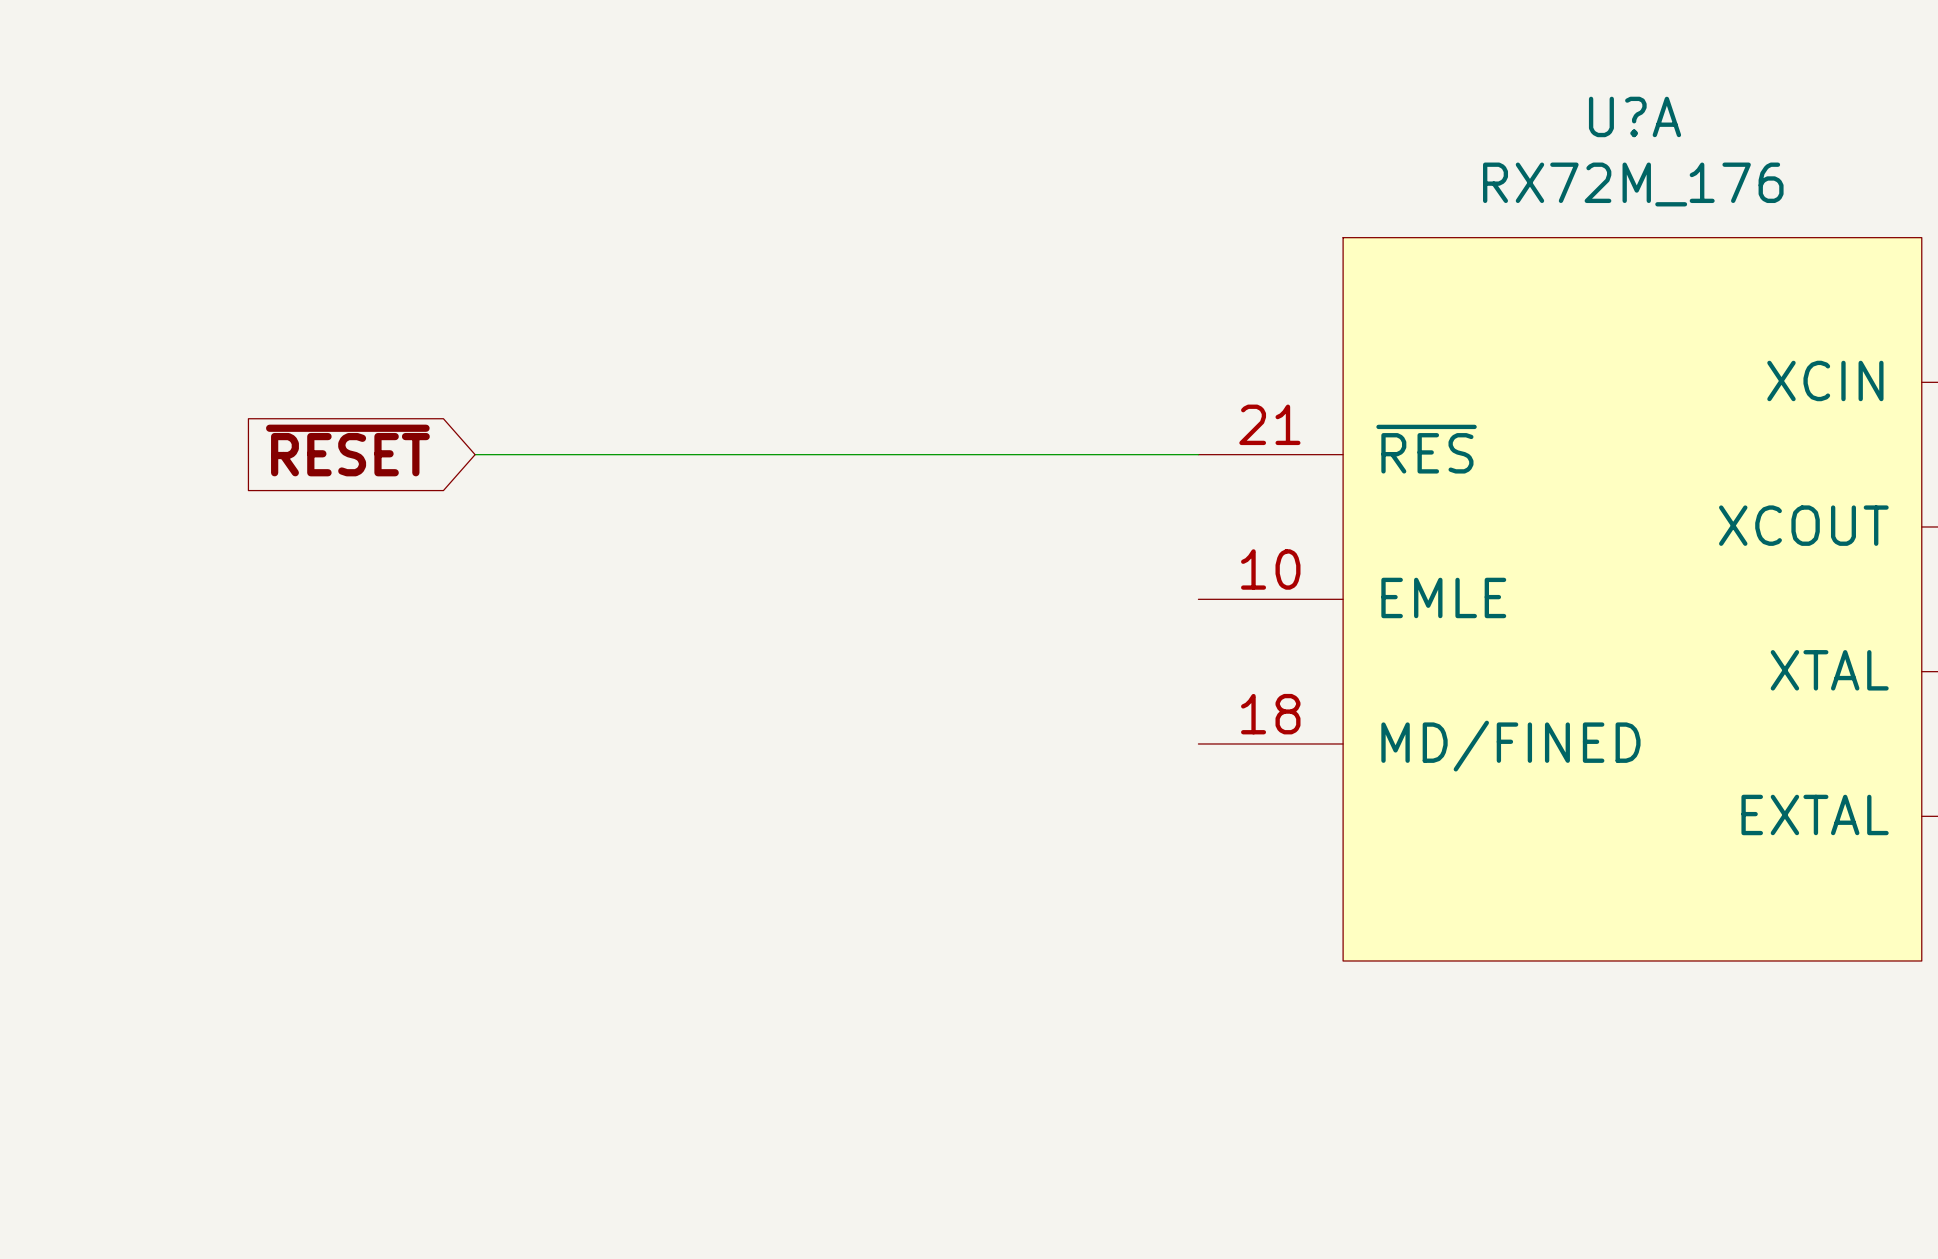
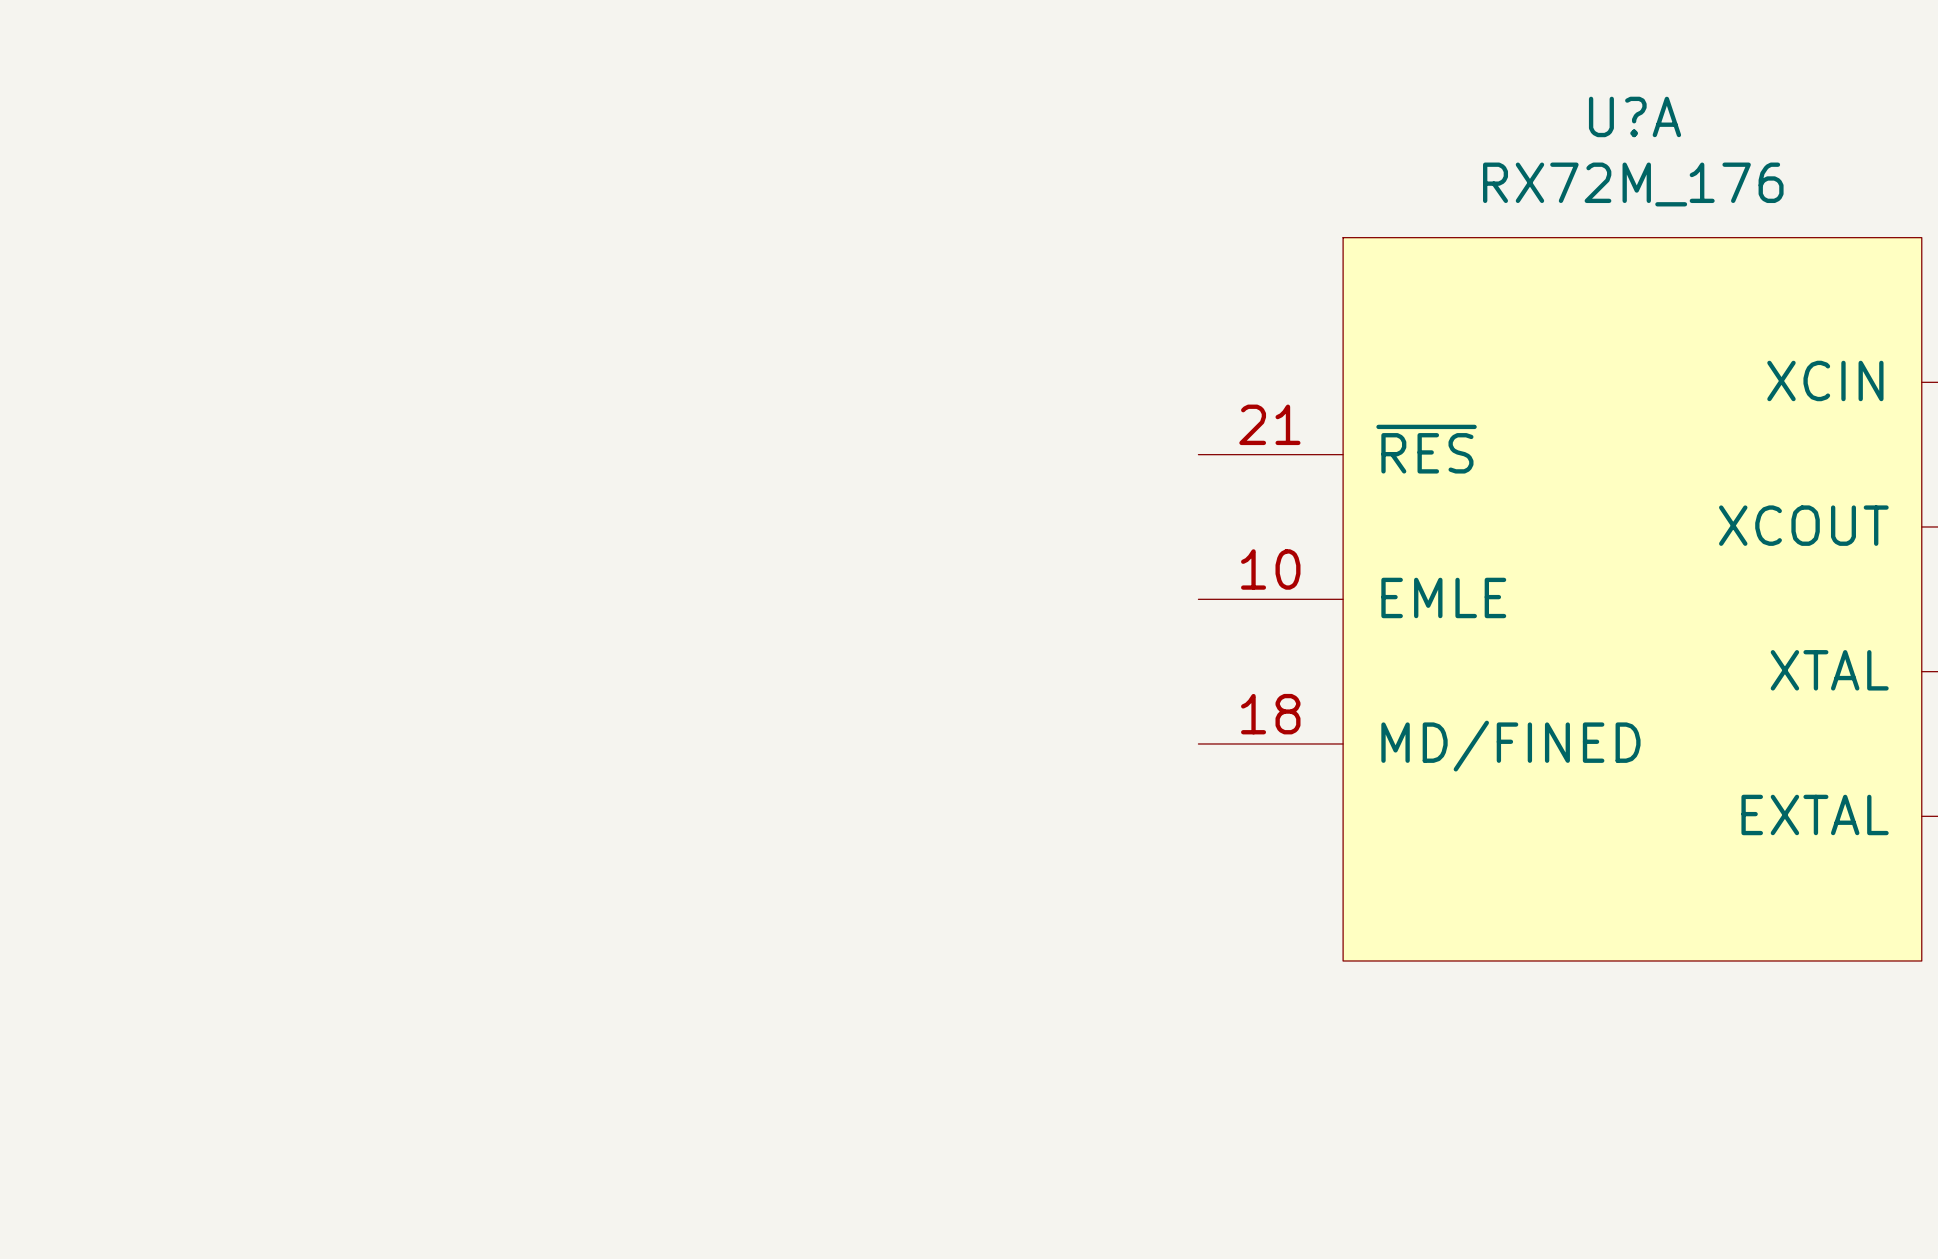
global label: ~{RESET} (347, 450) -> none
wire: (475, 454) (1198, 454) -> none

